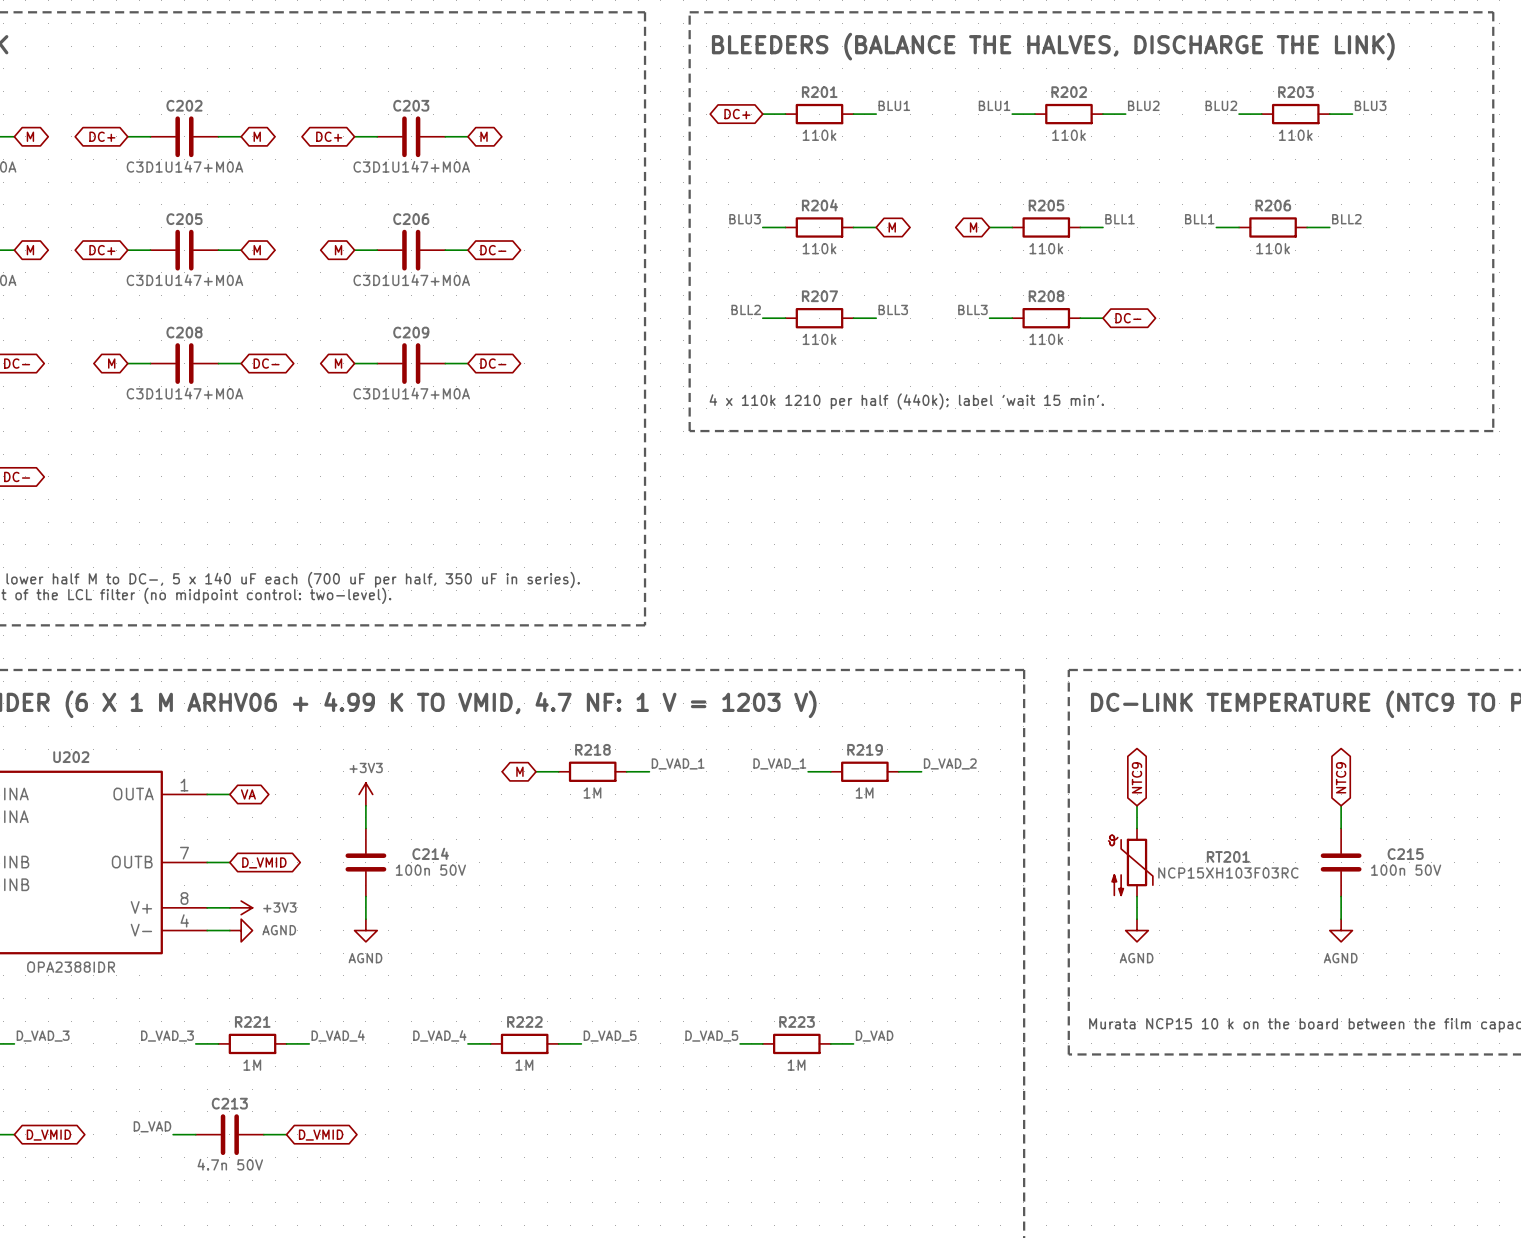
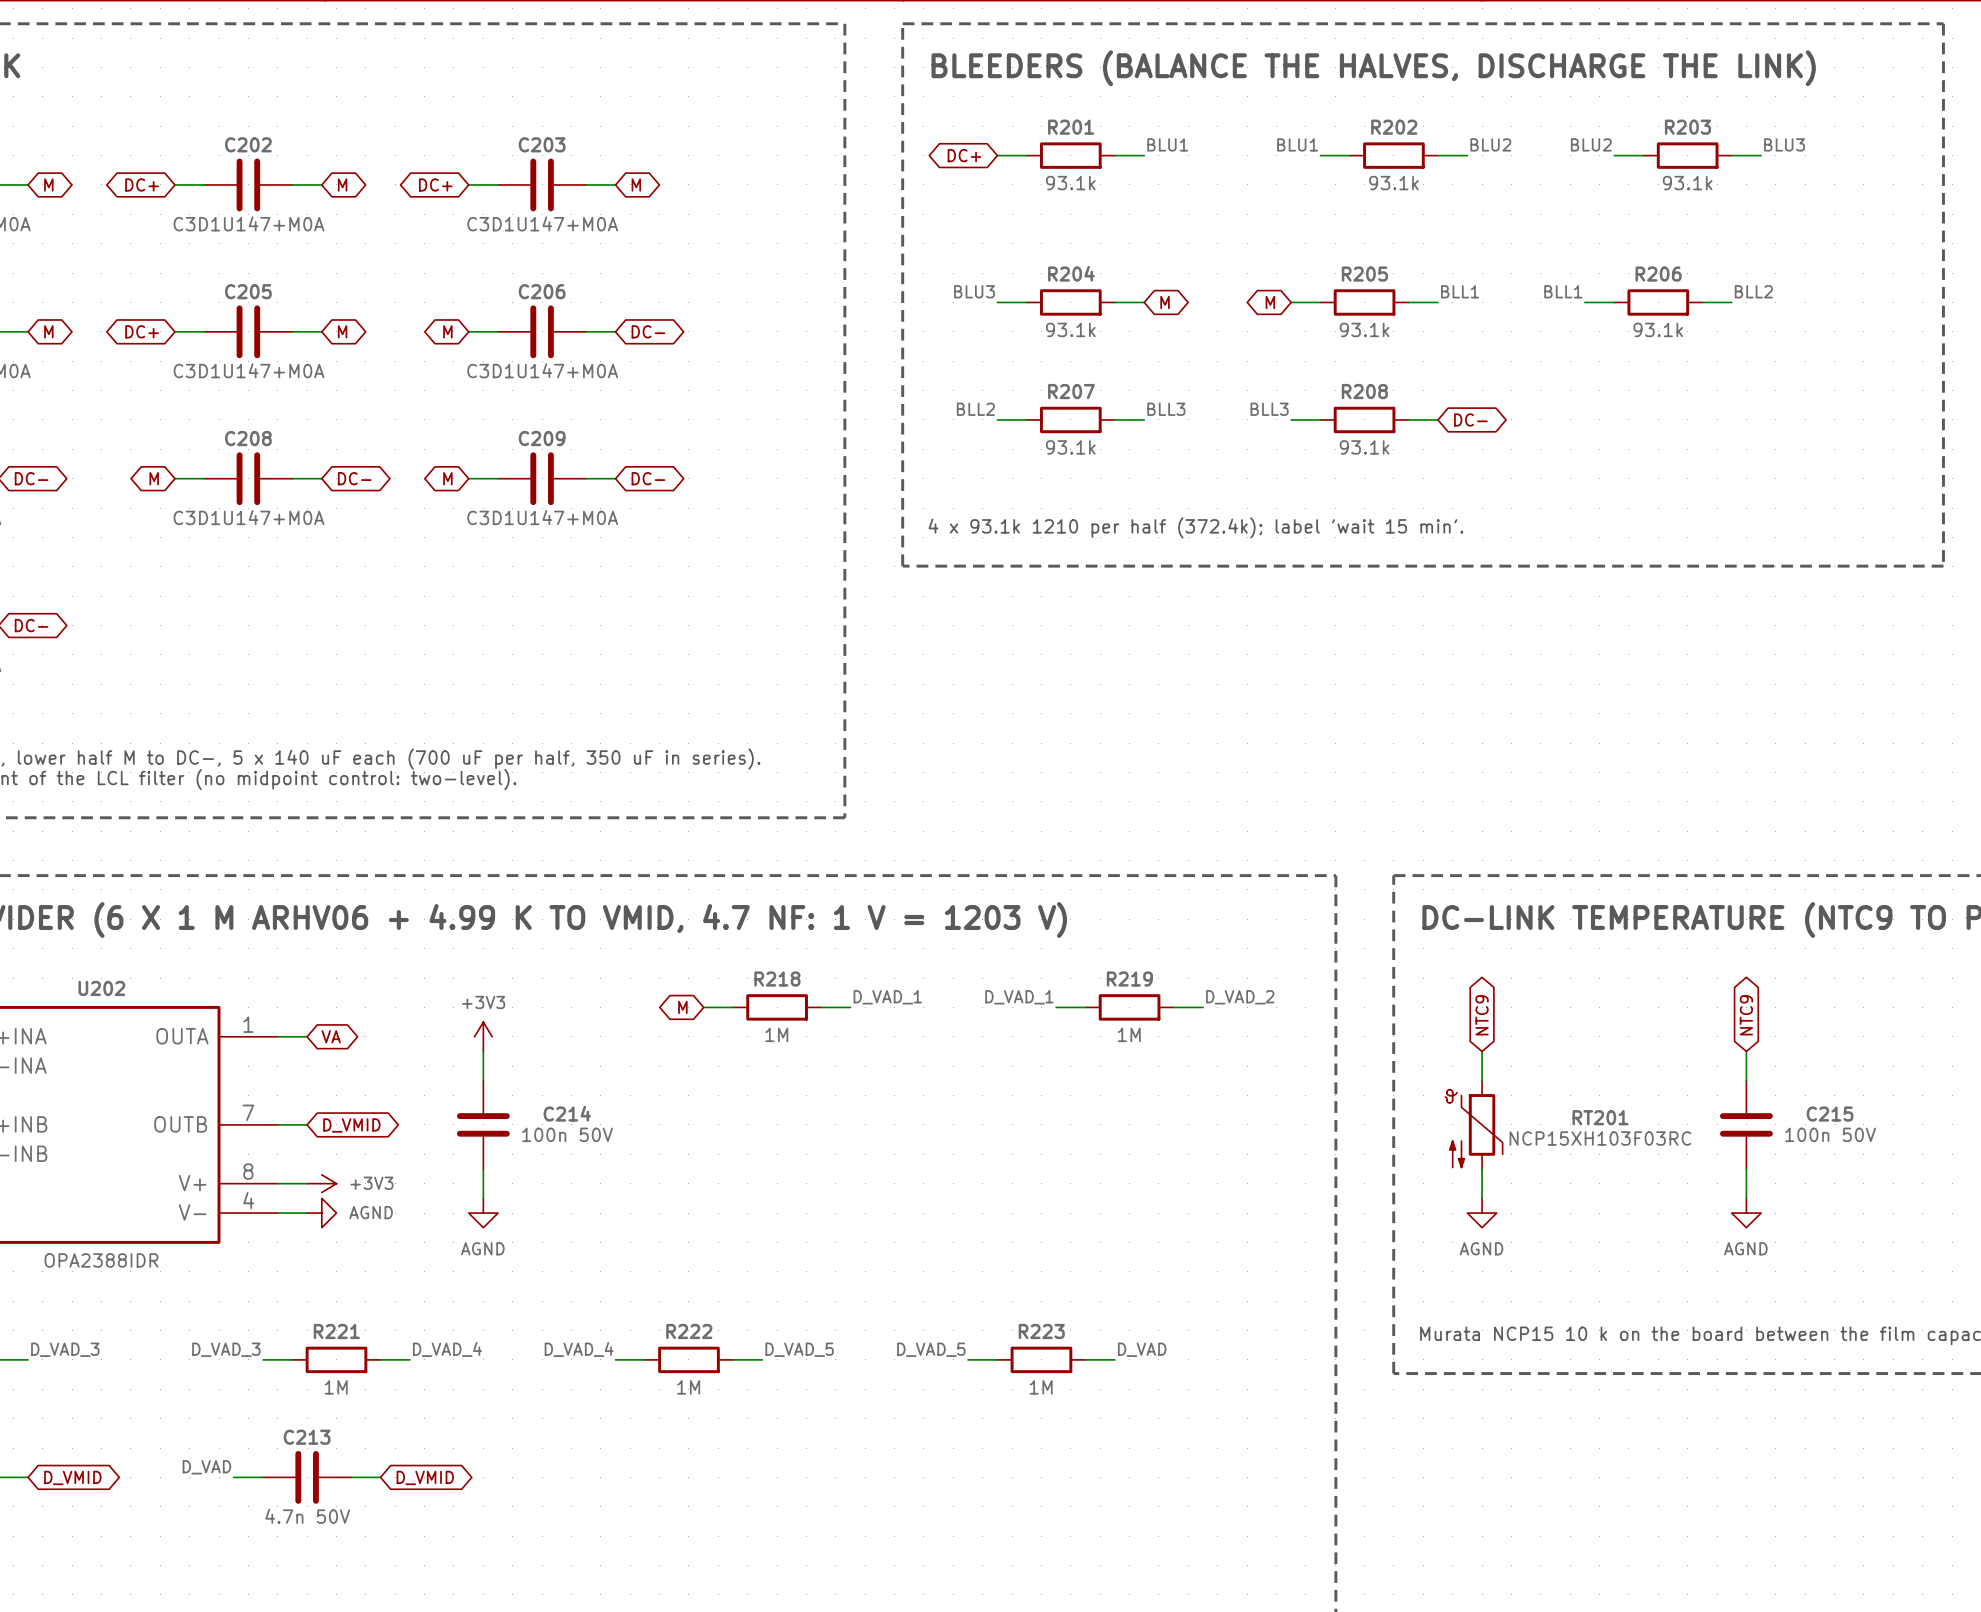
R201 value: 110k (819, 135) -> 93.1k (1070, 183)
R202 value: 110k (1068, 135) -> 93.1k (1393, 183)
R203 value: 110k (1295, 135) -> 93.1k (1687, 183)
R204 value: 110k (819, 248) -> 93.1k (1070, 329)
R205 value: 110k (1046, 248) -> 93.1k (1364, 329)
R206 value: 110k (1273, 248) -> 93.1k (1658, 329)
R207 value: 110k (819, 339) -> 93.1k (1070, 447)
R208 value: 110k (1046, 339) -> 93.1k (1364, 447)
text: 4 x 110k 1210 per half (440k); label 'wait 15 min'. (906, 401) -> 4 x 93.1k 1210 per half (372.4k); label 'wait 15 min'. (1195, 527)

